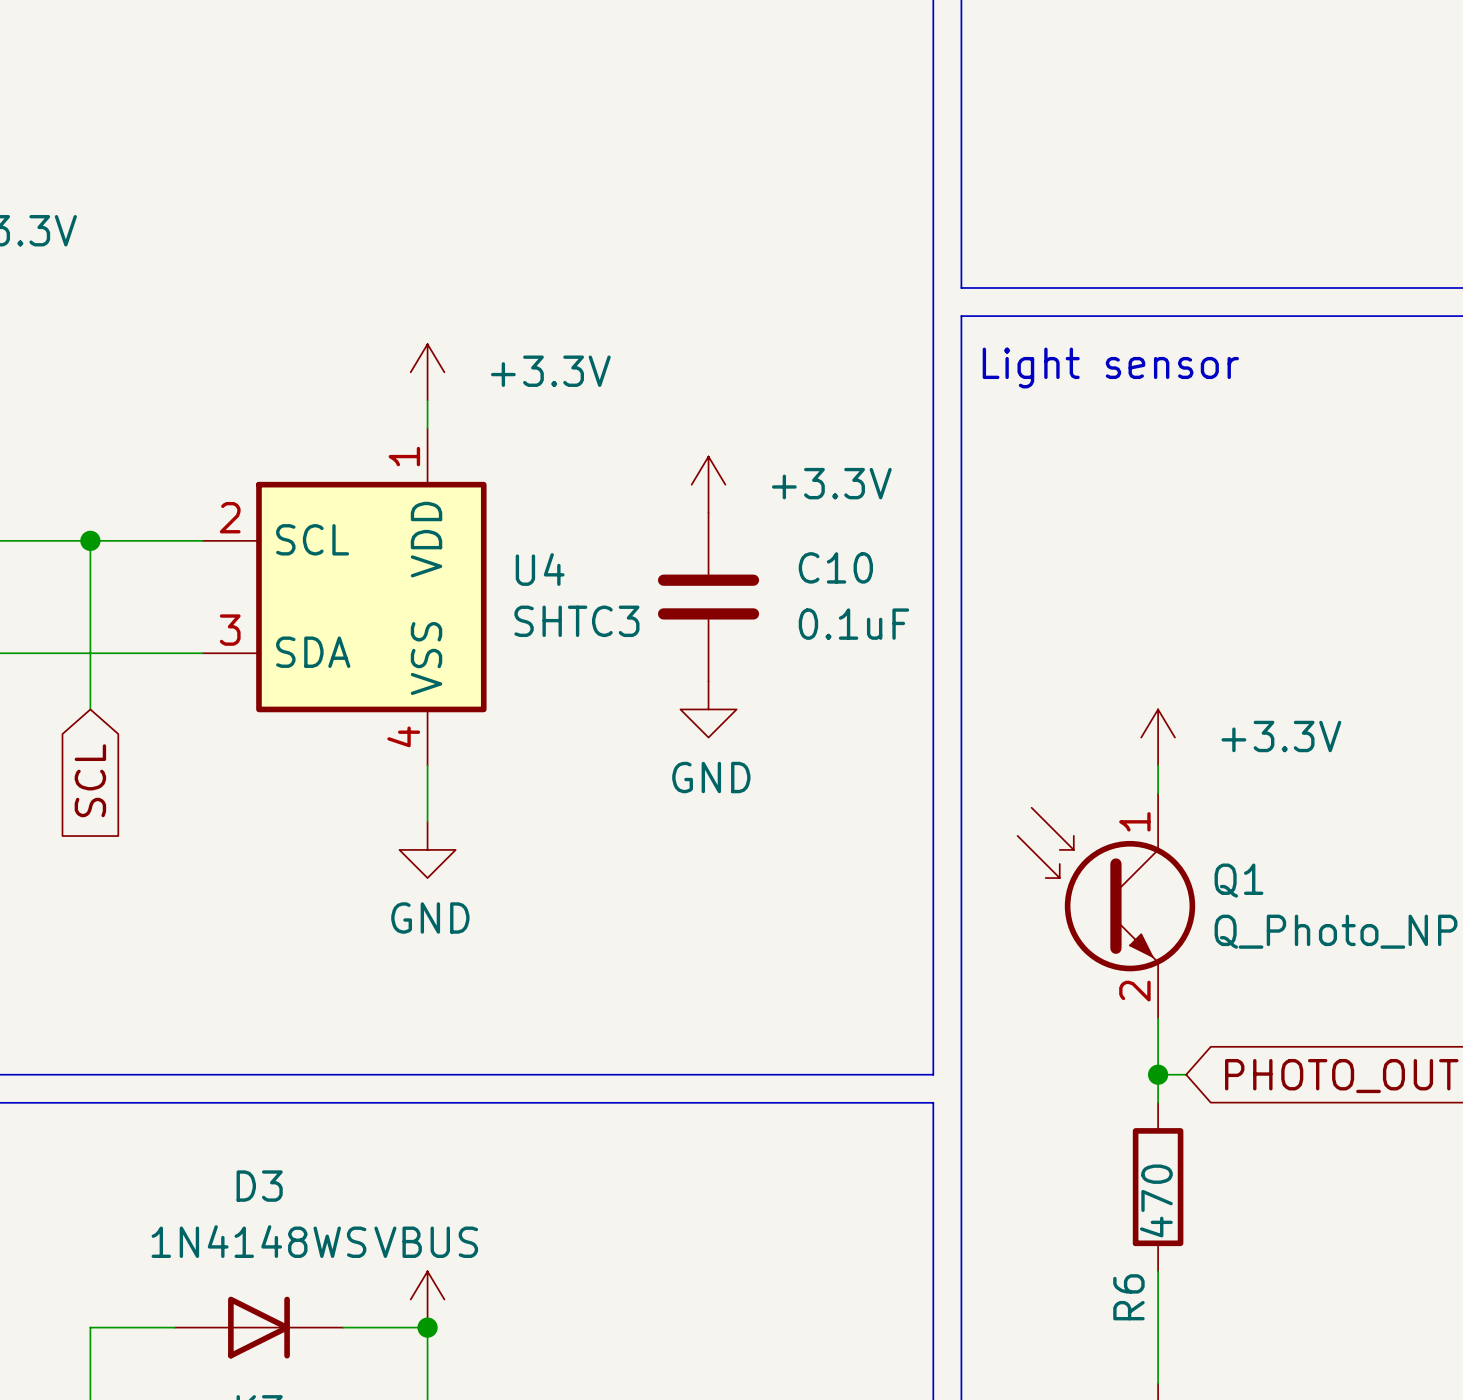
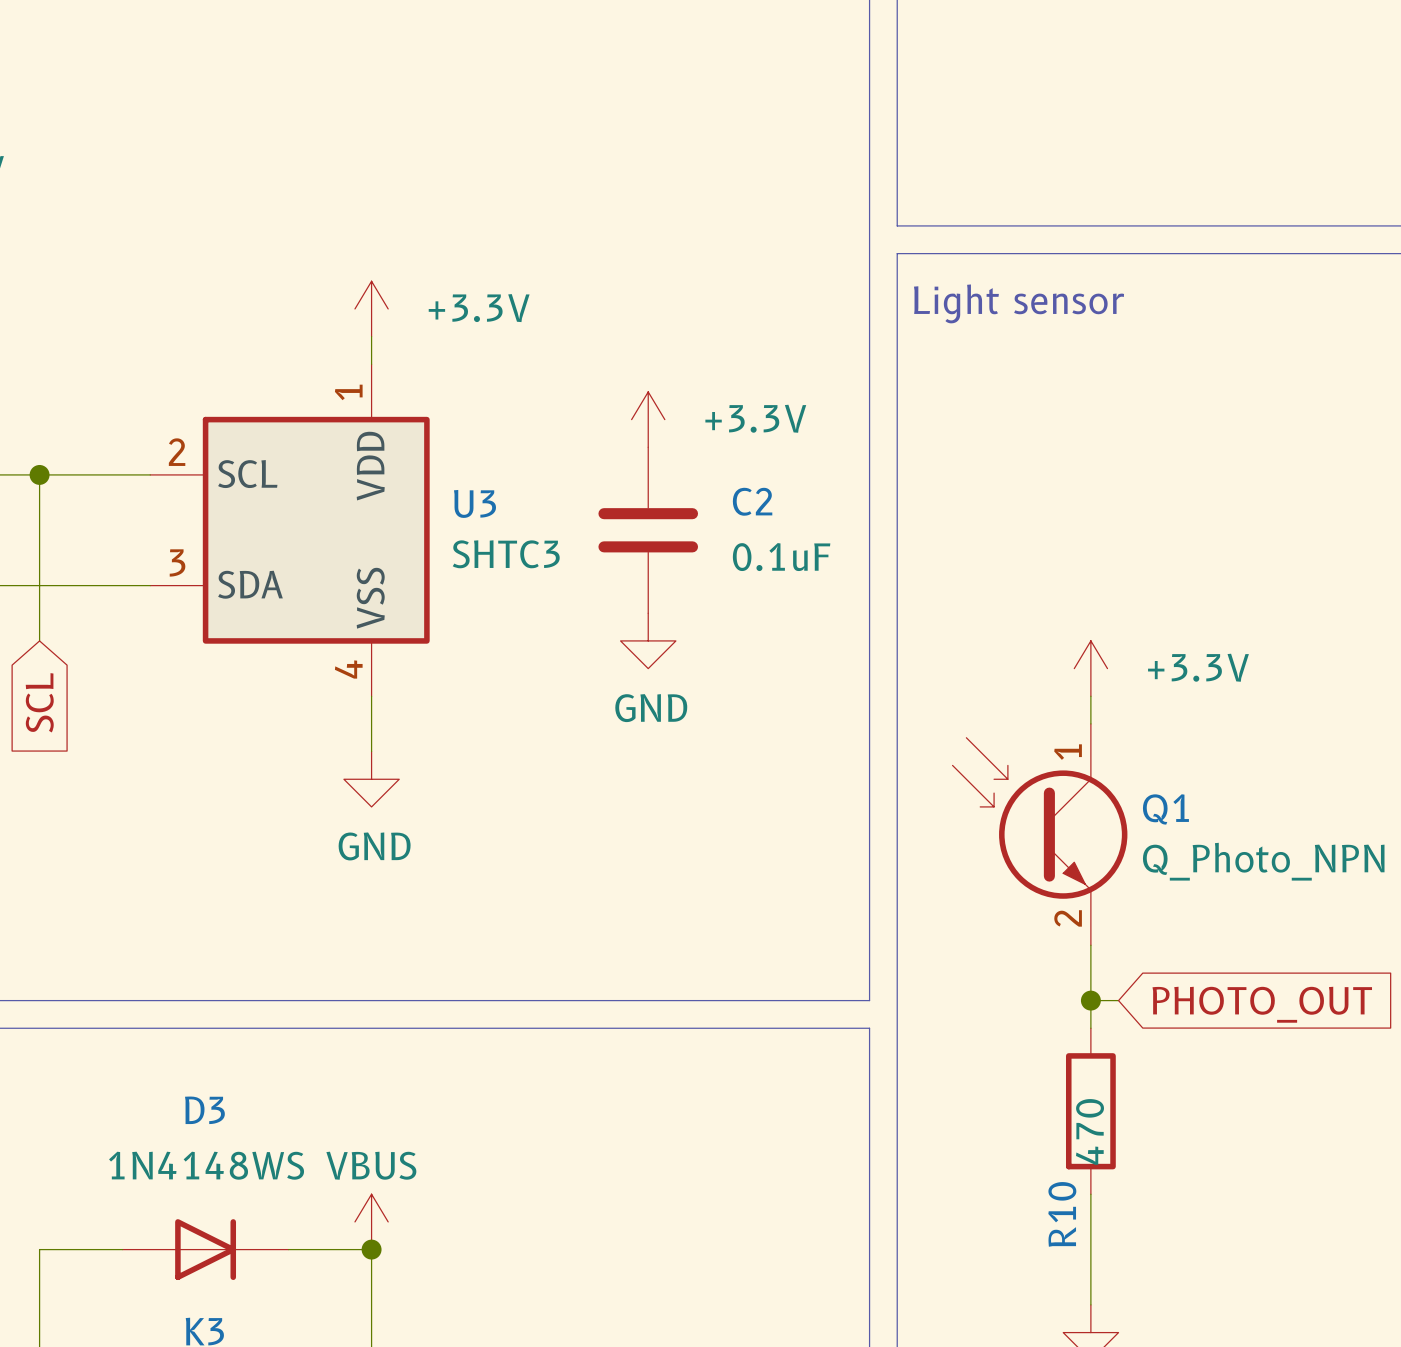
C10 name: C10 (835, 567) -> C2 (752, 501)
U4 name: U4 (540, 569) -> U3 (474, 503)
R6 name: R6 (1128, 1297) -> R10 (1062, 1214)

